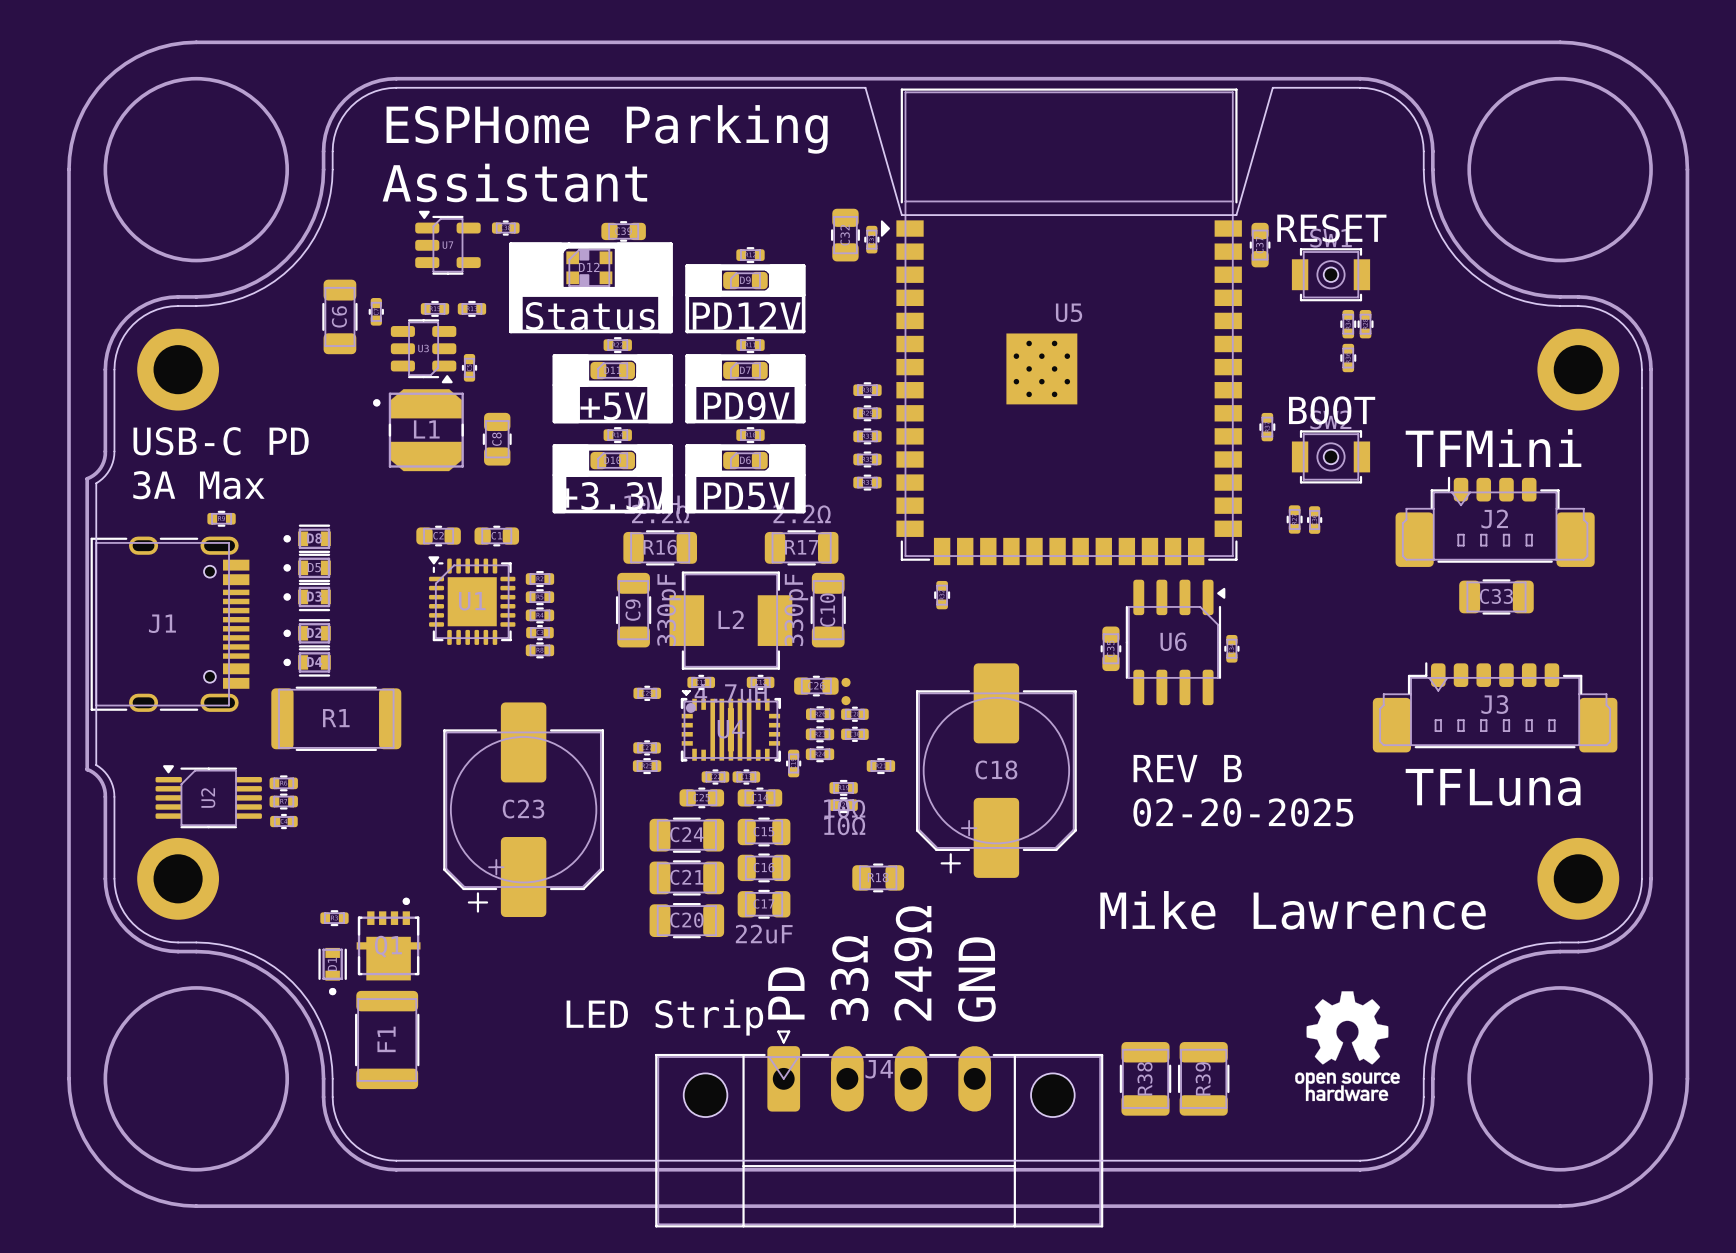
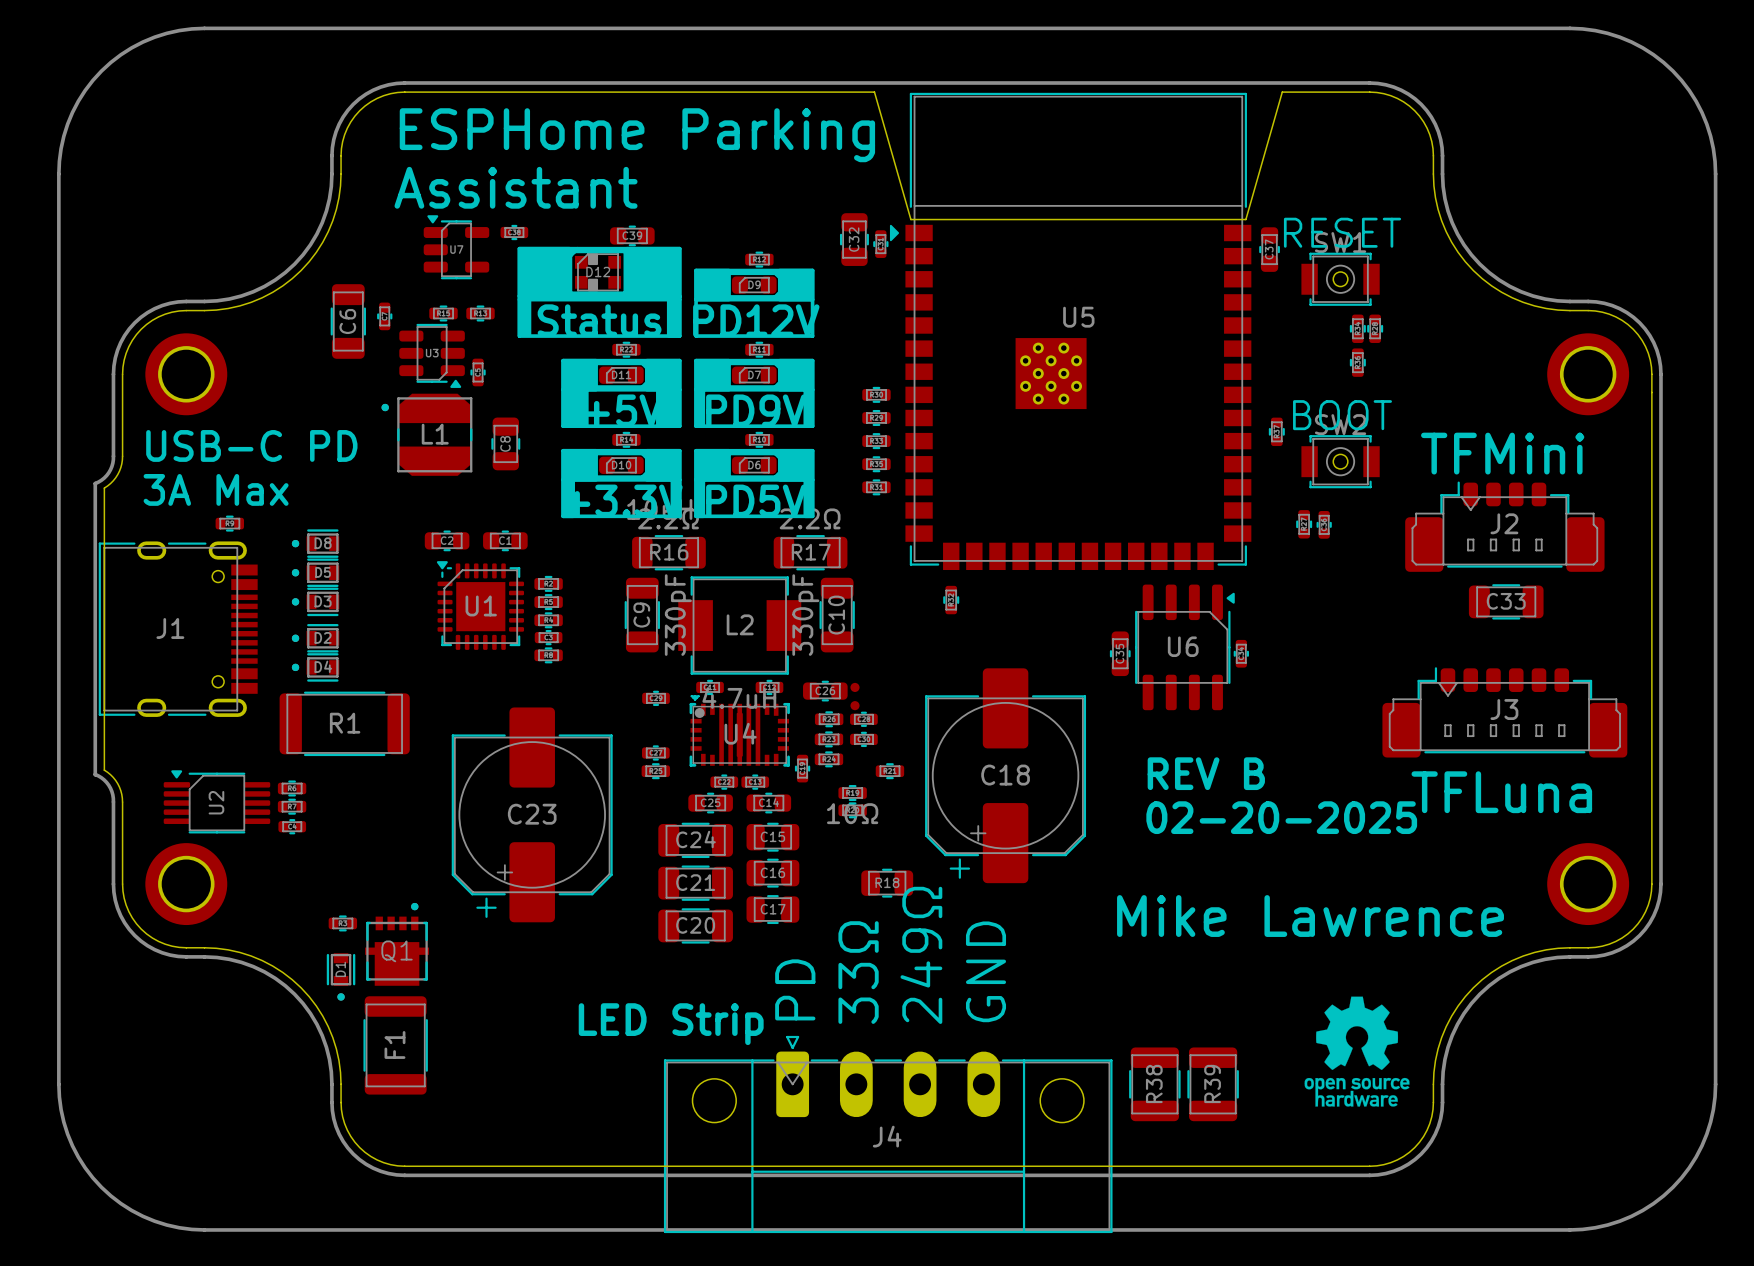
line: (196, 42) (1560, 42) (1584, 44) (1608, 52) (1640, 71) (1665, 98) (1677, 120) (1684, 144) (1687, 169) (1687, 1078) (1681, 1115) (1672, 1138) (1658, 1159) (1640, 1177) (1620, 1191) (1597, 1200) (1560, 1206) (196, 1206) (171, 1203) (147, 1196) (115, 1177) (97, 1159) (84, 1138) (74, 1115) (68, 1078) (69, 157) (74, 132) (84, 109) (97, 88) (115, 71) (136, 57) (159, 47) (196, 42) -> (204, 28) (166, 33) (142, 42) (120, 54) (101, 71) (85, 90) (72, 112) (63, 136) (59, 161) (59, 1097) (63, 1122) (72, 1145) (92, 1177) (110, 1195) (131, 1210) (154, 1221) (179, 1227) (204, 1229) (1569, 1229) (1595, 1227) (1631, 1216) (1663, 1195) (1681, 1177) (1696, 1157) (1706, 1134) (1713, 1109) (1715, 1084) (1715, 174) (1713, 148) (1701, 112) (1689, 90) (1663, 62) (1642, 47) (1619, 37) (1595, 30) (1569, 28) (204, 28)
drawing: [103, 76, 290, 263] -> none
drawing: [1467, 76, 1653, 263] -> none
part value: 10Ω (844, 825) -> none
C17 value: 22uF (764, 934) -> none
drawing: [103, 986, 290, 1172] -> none
drawing: [1467, 986, 1653, 1172] -> none
J4 name position: J4 (879, 1069) -> J4 (887, 1136)

